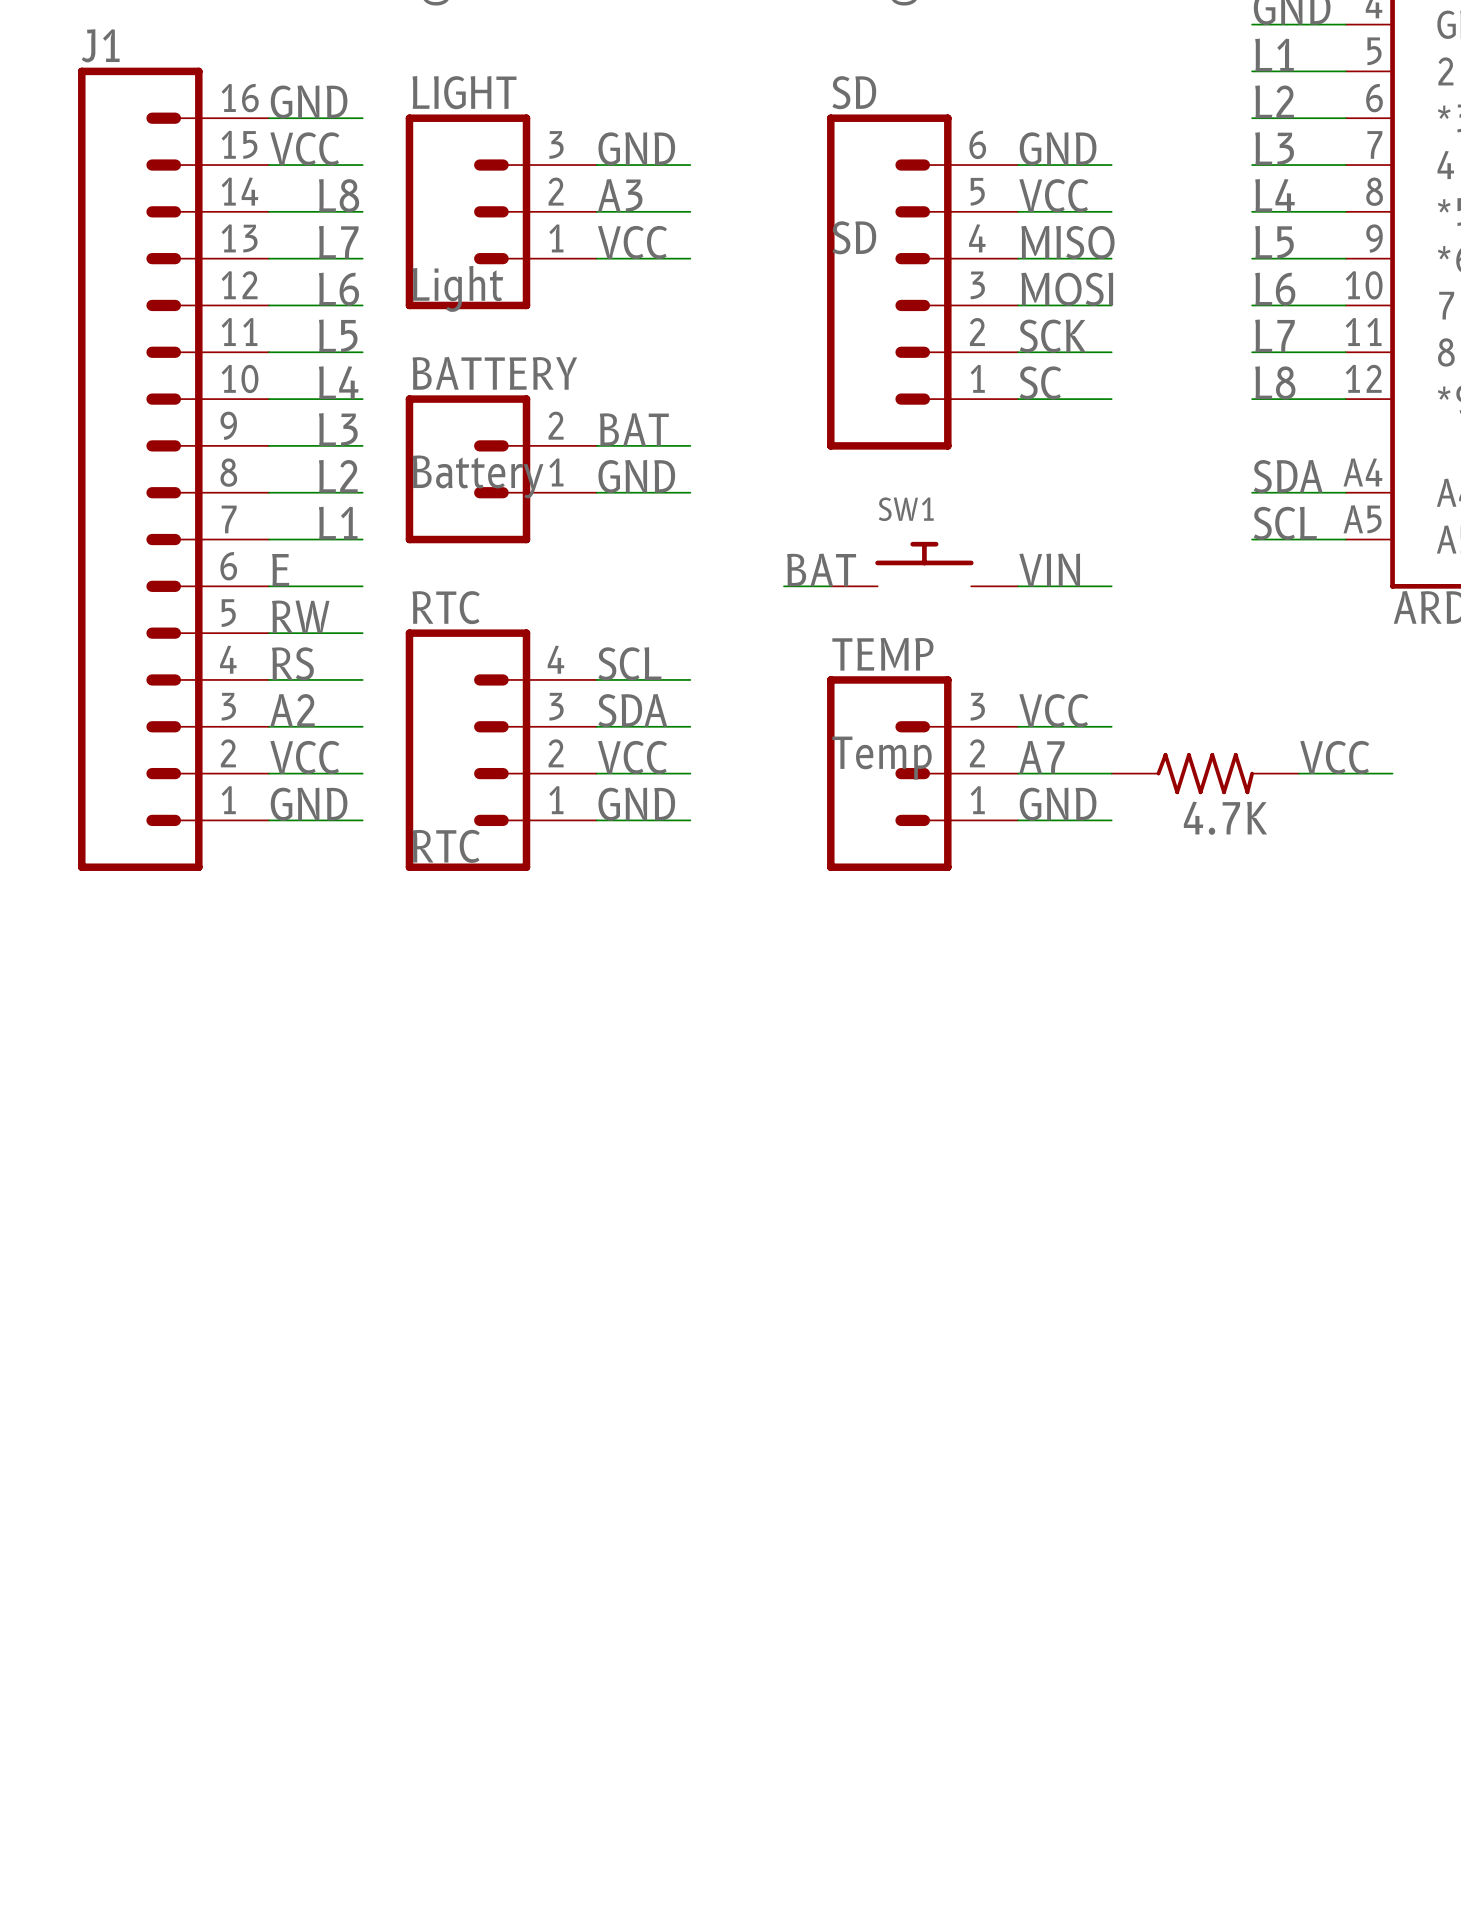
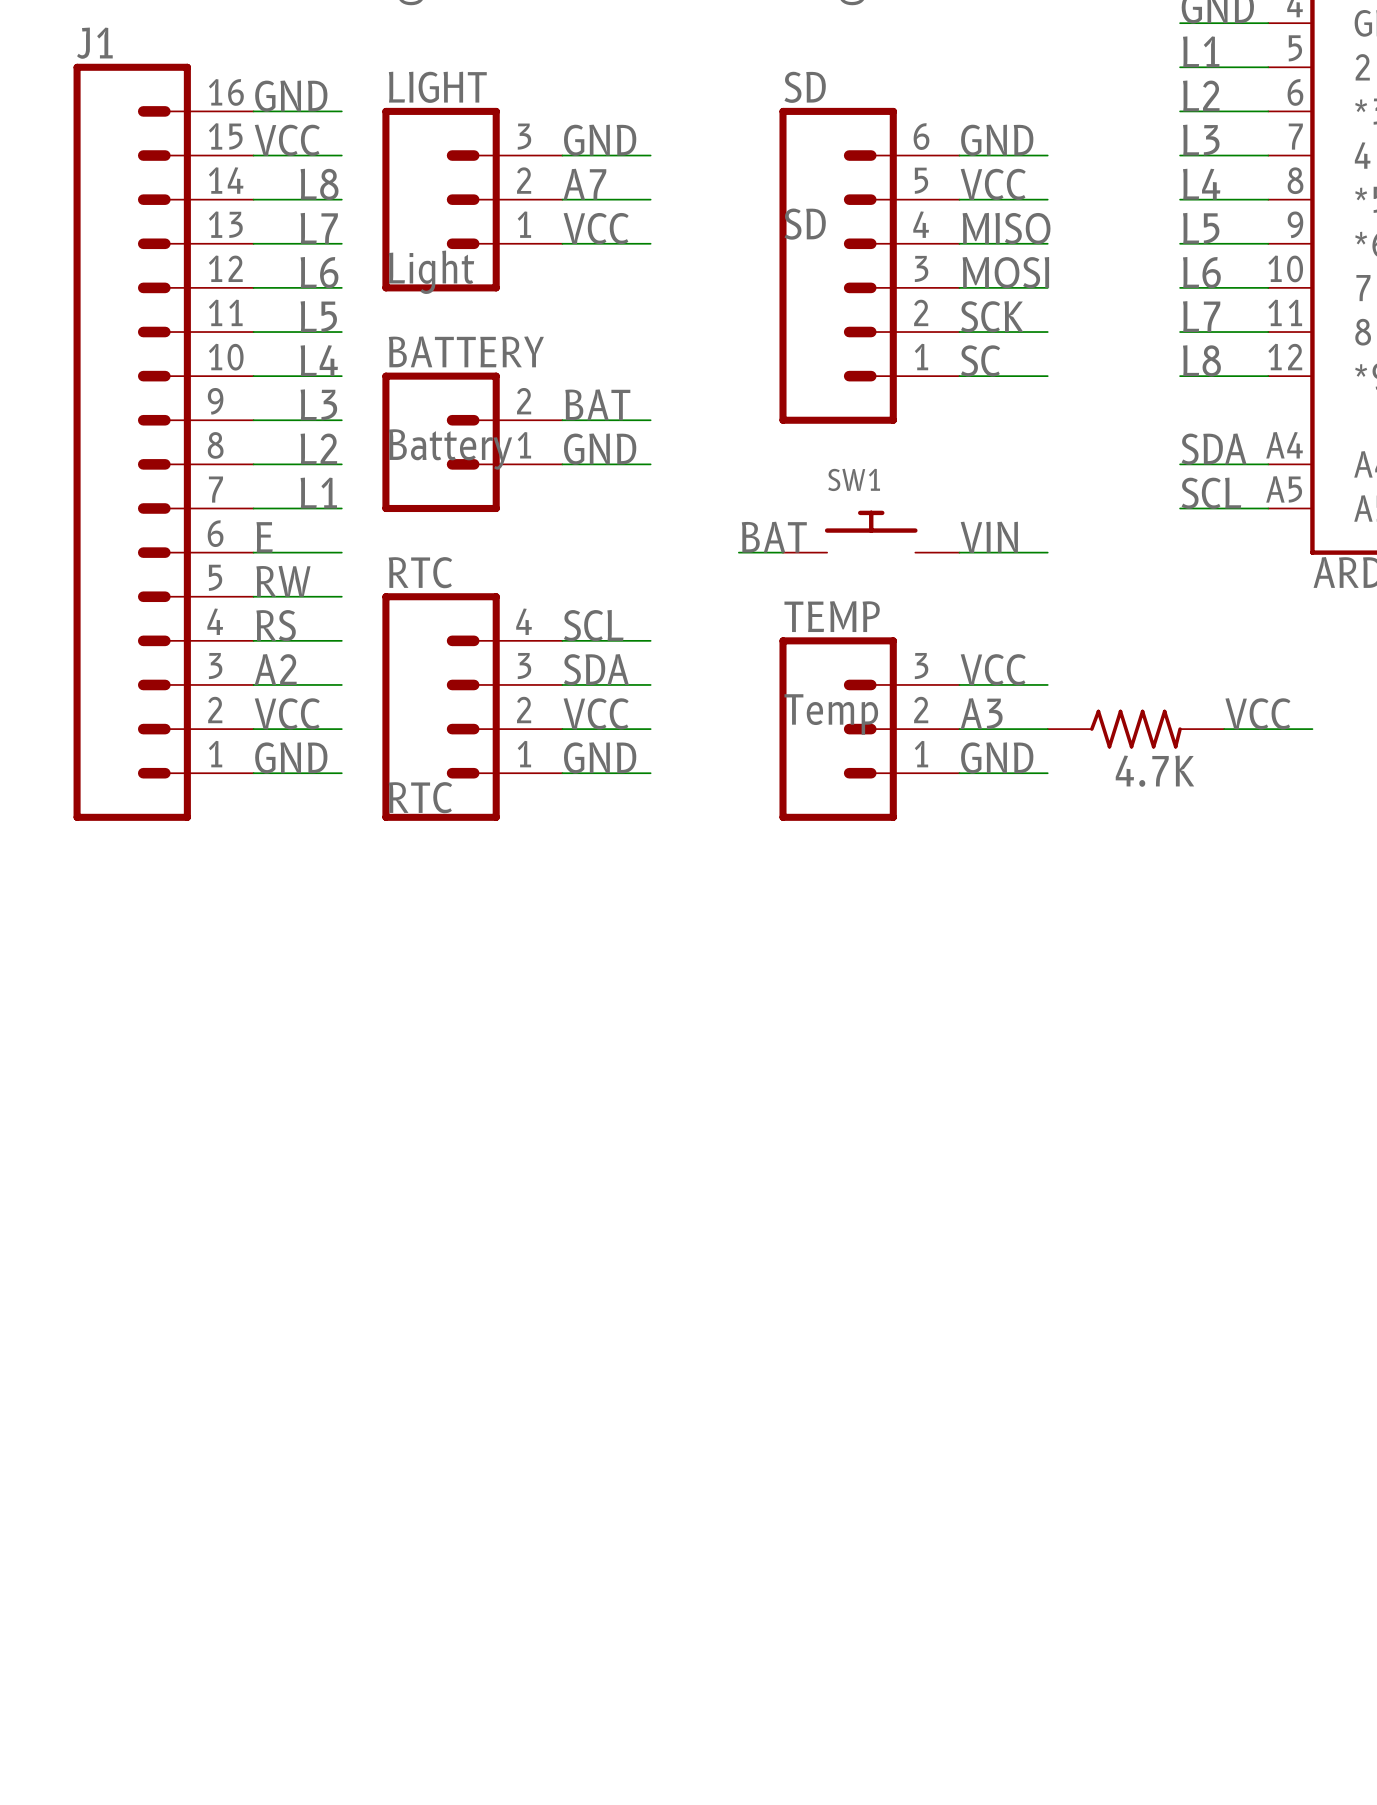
label: A3 (620, 195) -> A7 (584, 184)
label: A7 (1041, 757) -> A3 (981, 713)

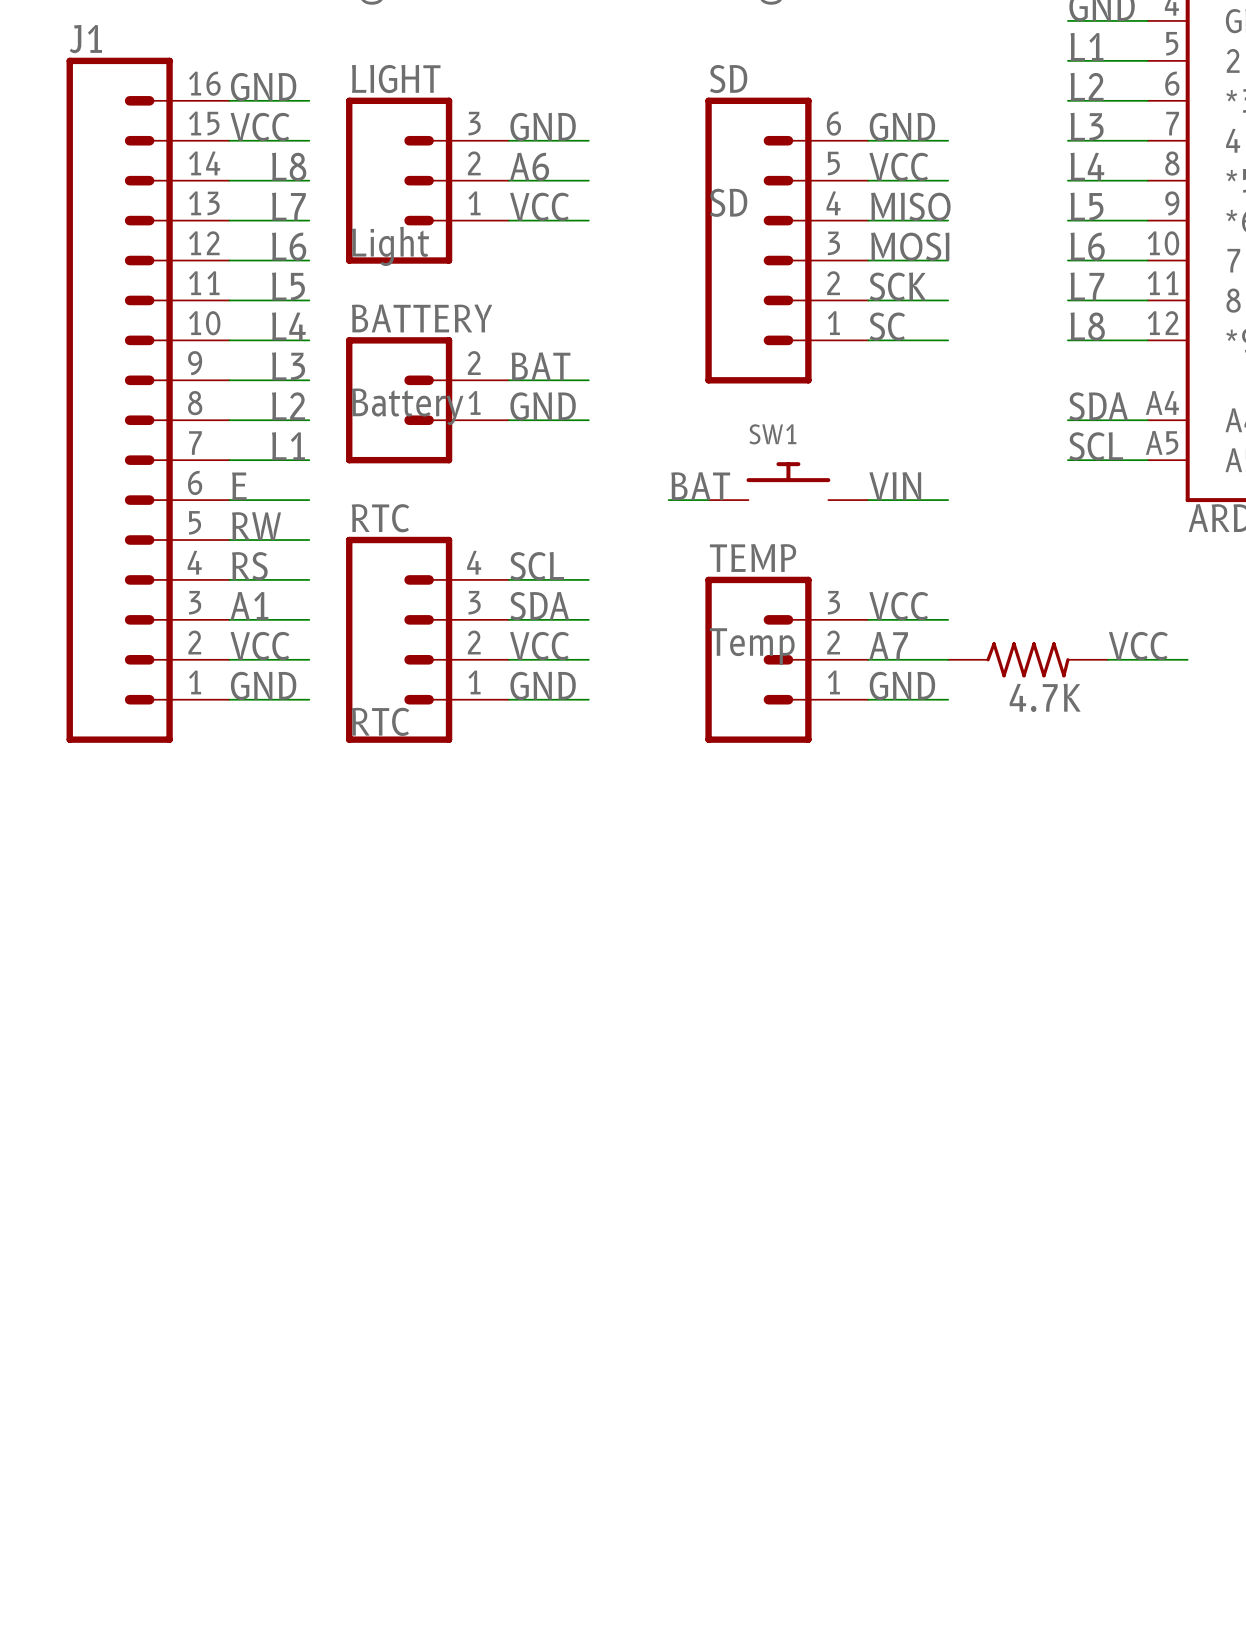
label: A7 (584, 184) -> A6 (529, 166)
label: A2 (275, 669) -> A1 (249, 605)
label: A3 (981, 713) -> A7 (888, 645)

